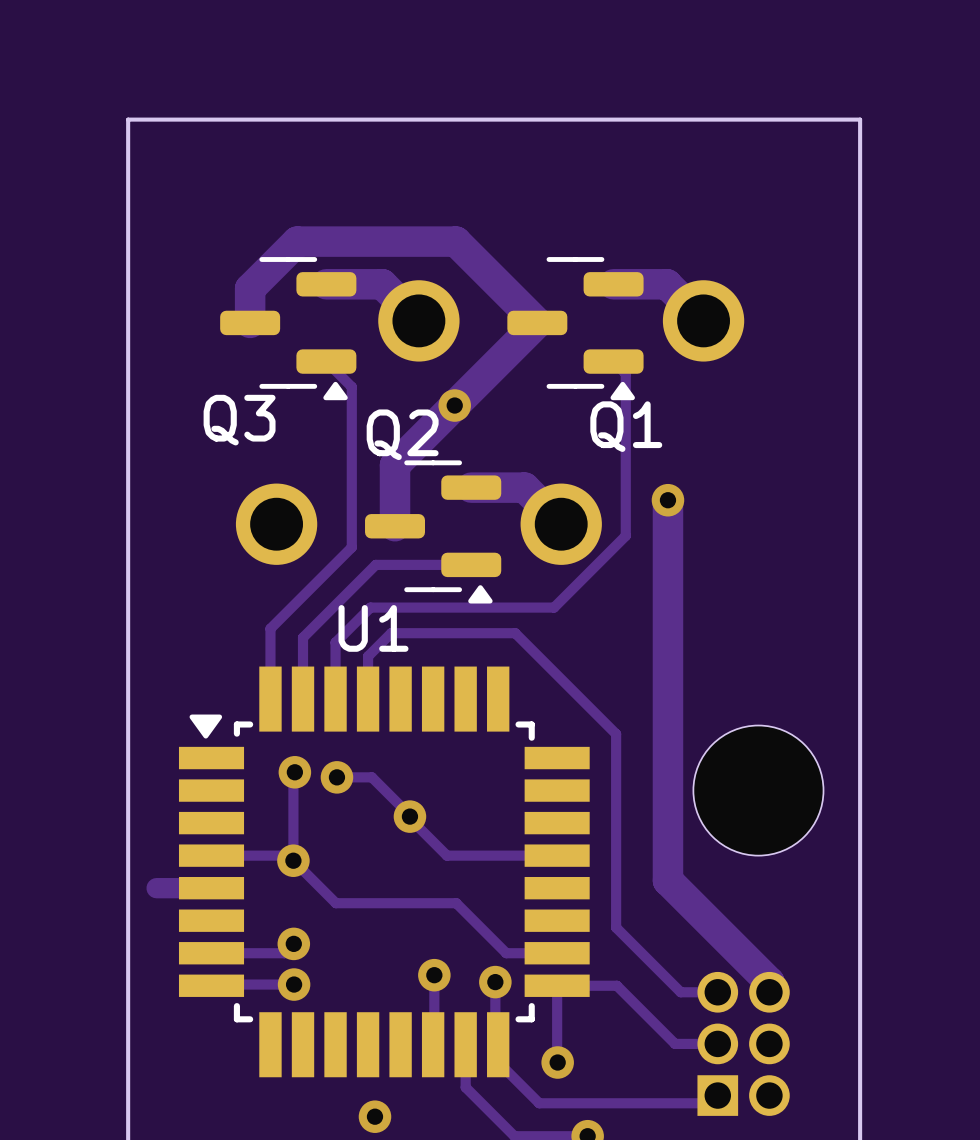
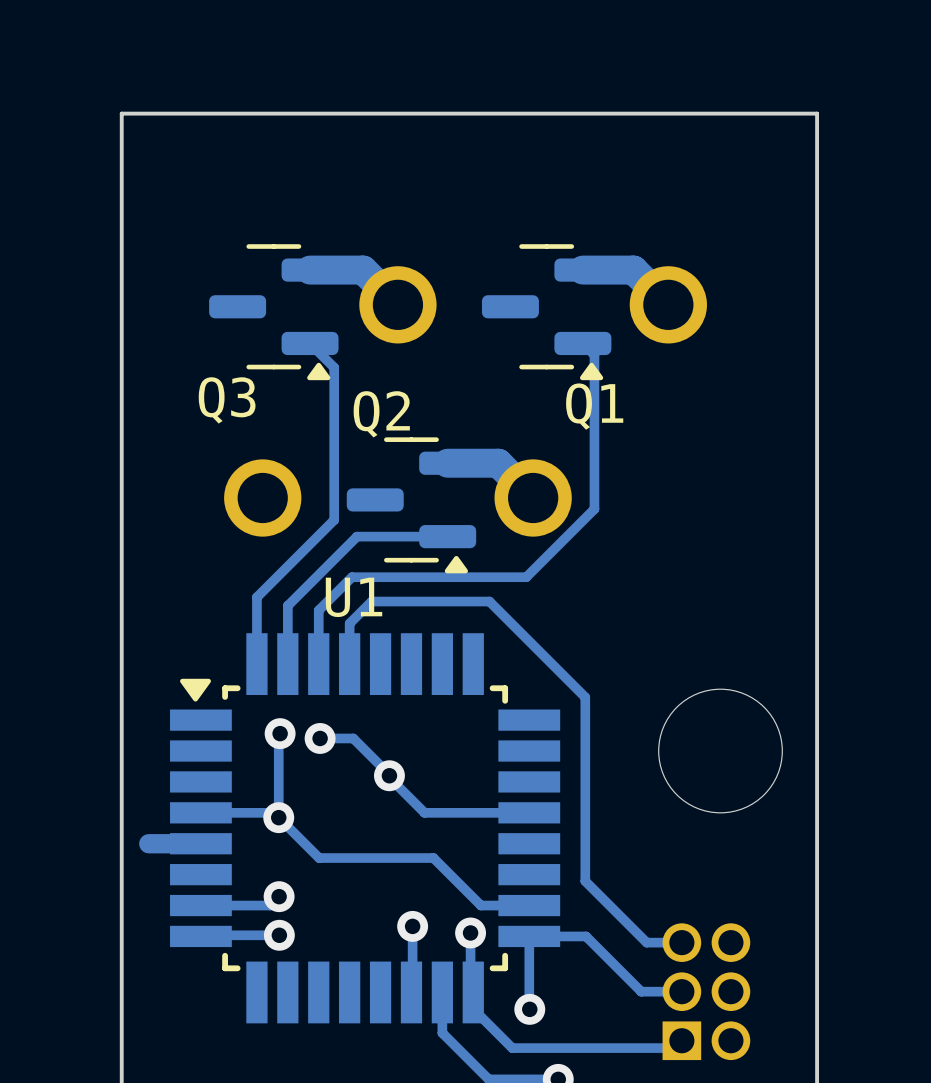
track: (250, 322) (250, 288) (297, 241) (456, 241) (537, 322) (395, 465) (395, 526) -> none
via: (454, 405) -> none
track: (667, 500) (667, 880) (769, 982) (769, 992) -> none
via: (667, 500) -> none
via: (374, 1116) -> none

